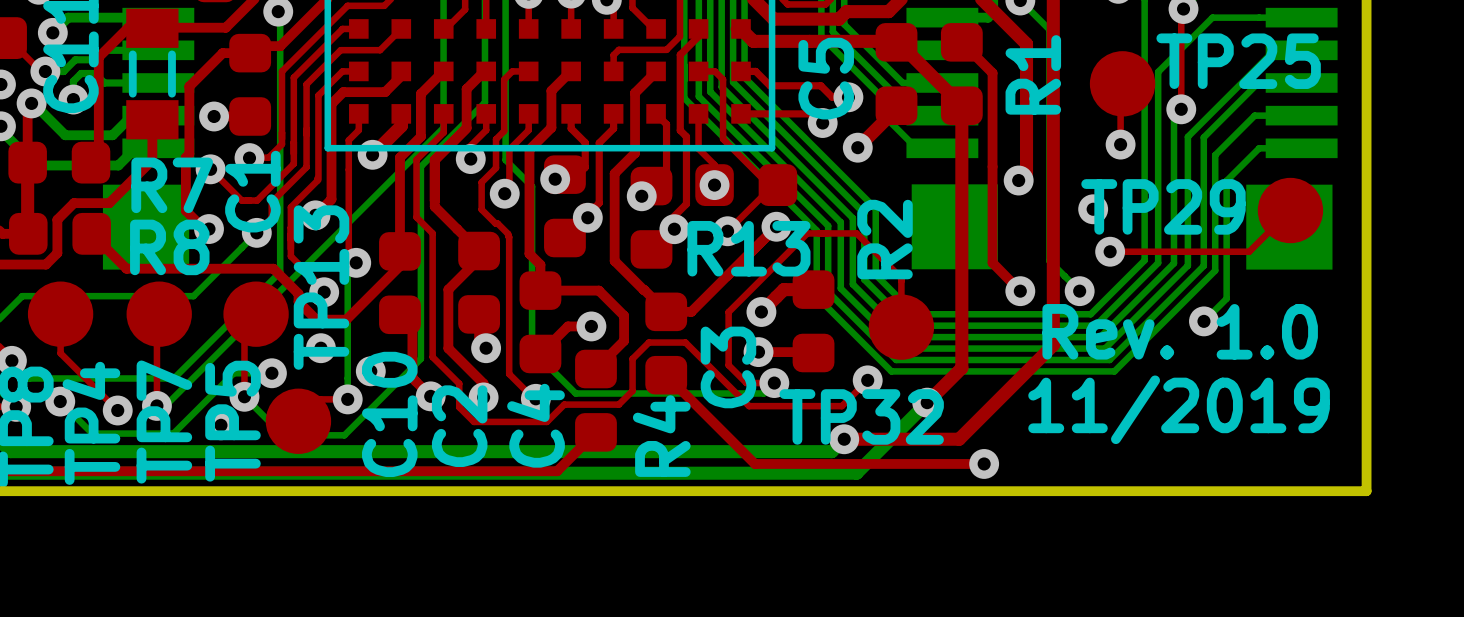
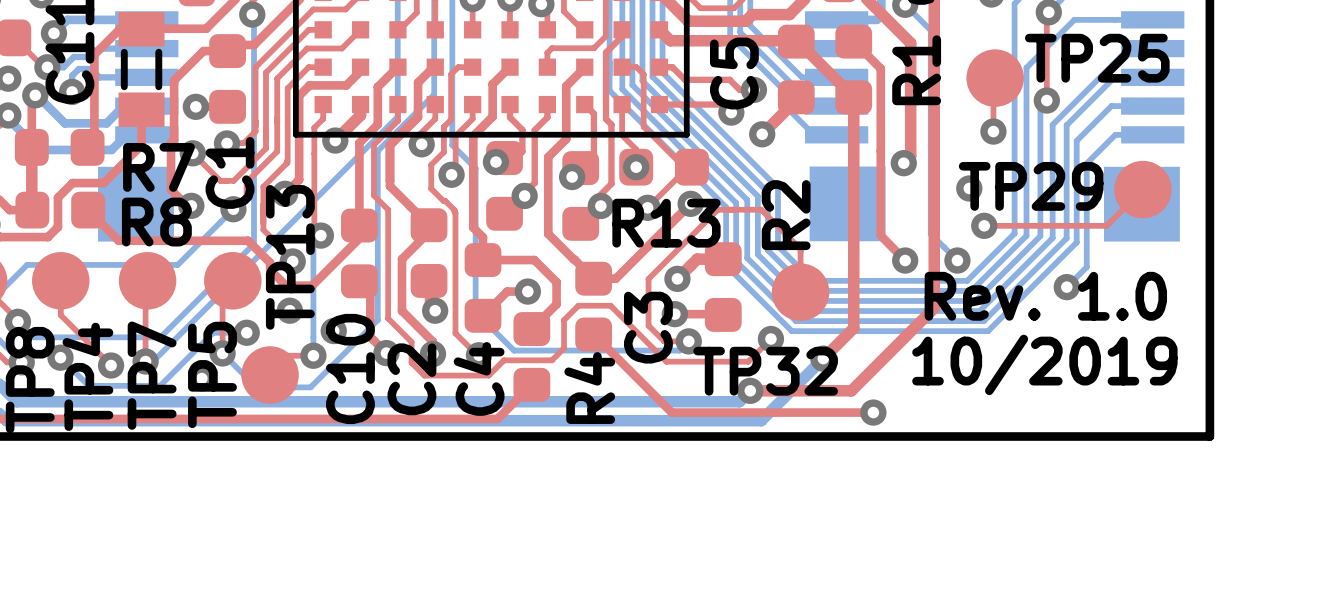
text: 11/2019 (1179, 409) -> 10/2019 (1044, 364)

